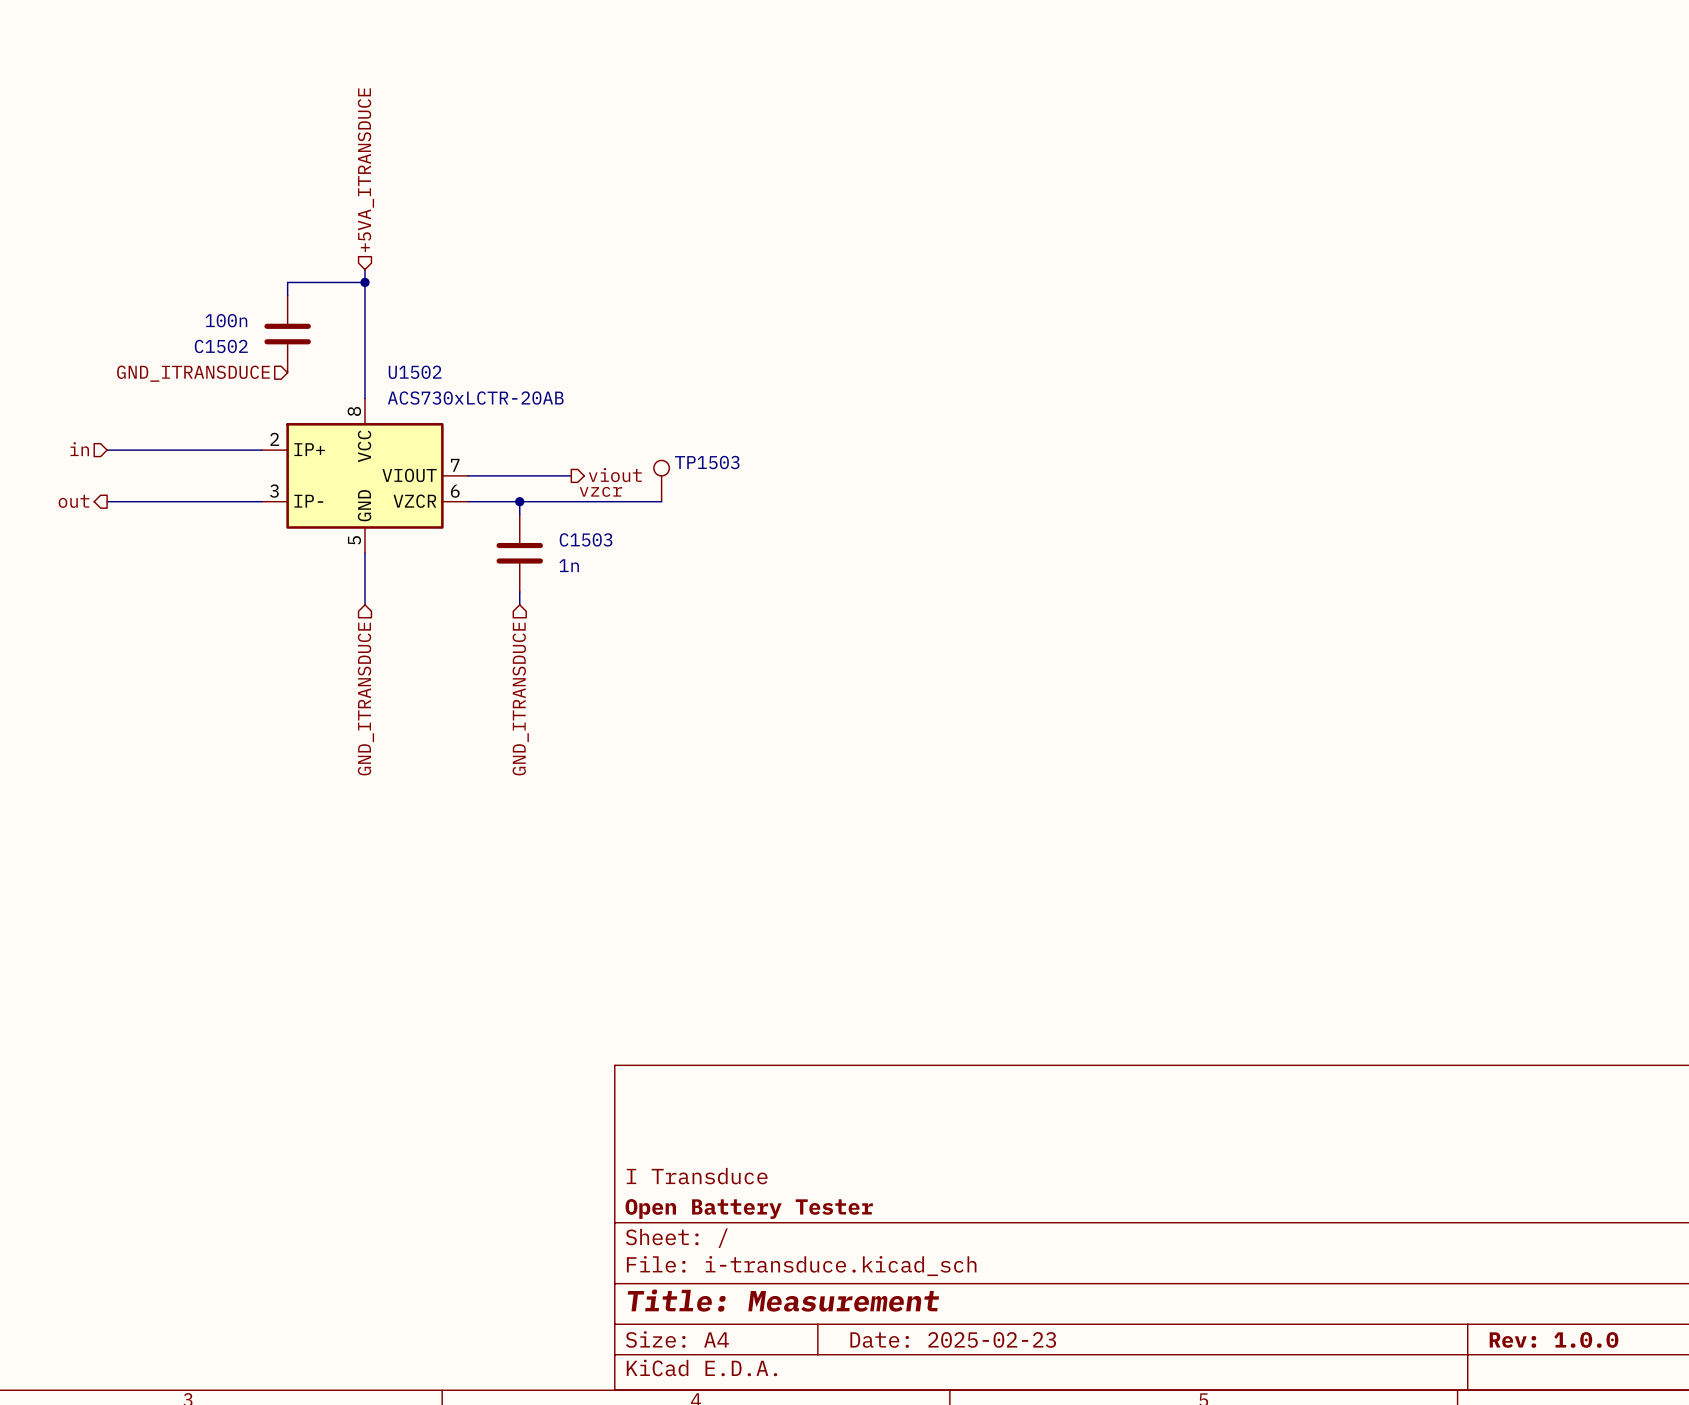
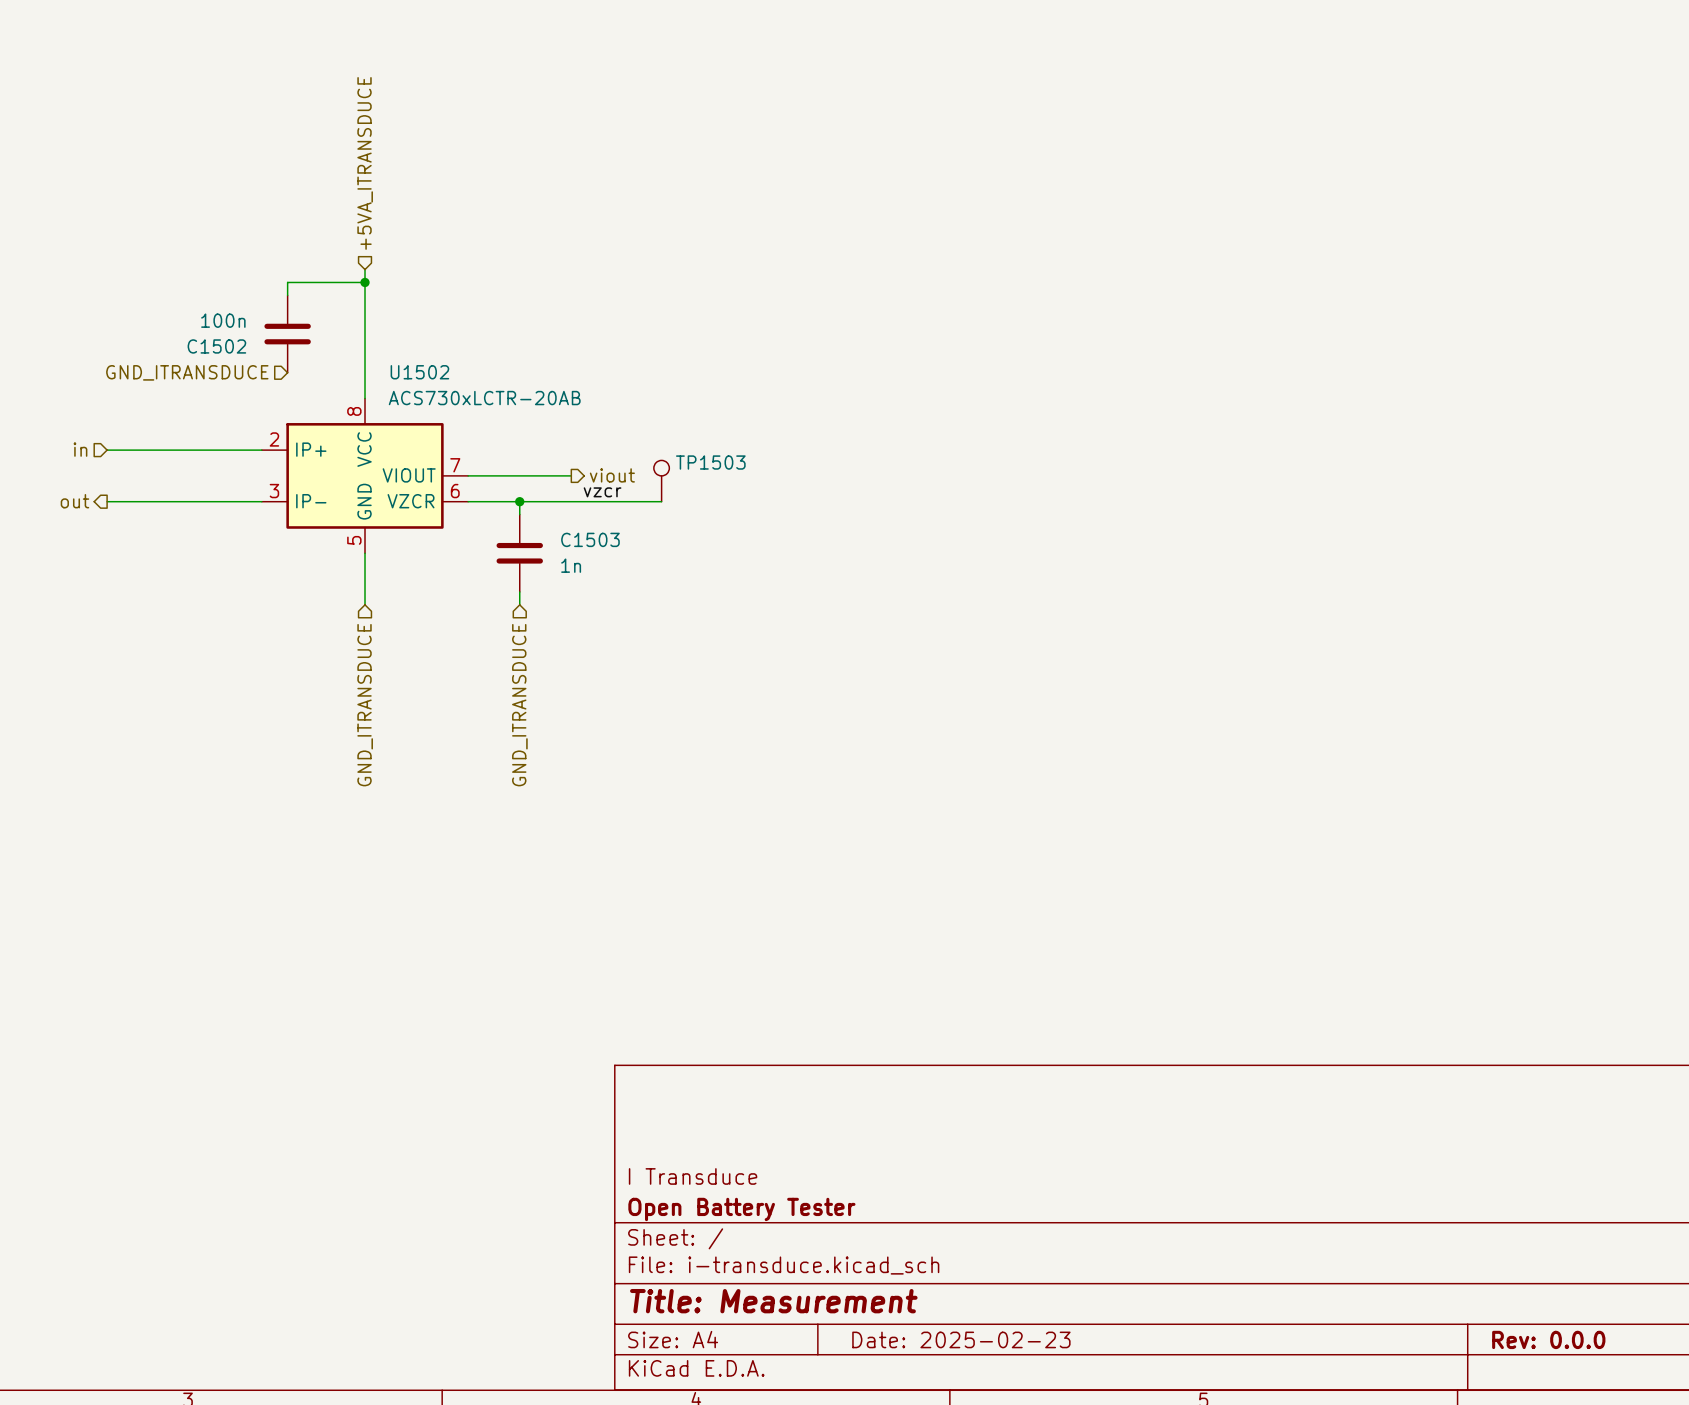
title block: Rev: 1.0.0 (1554, 1339) -> Rev: 0.0.0 (1548, 1339)

